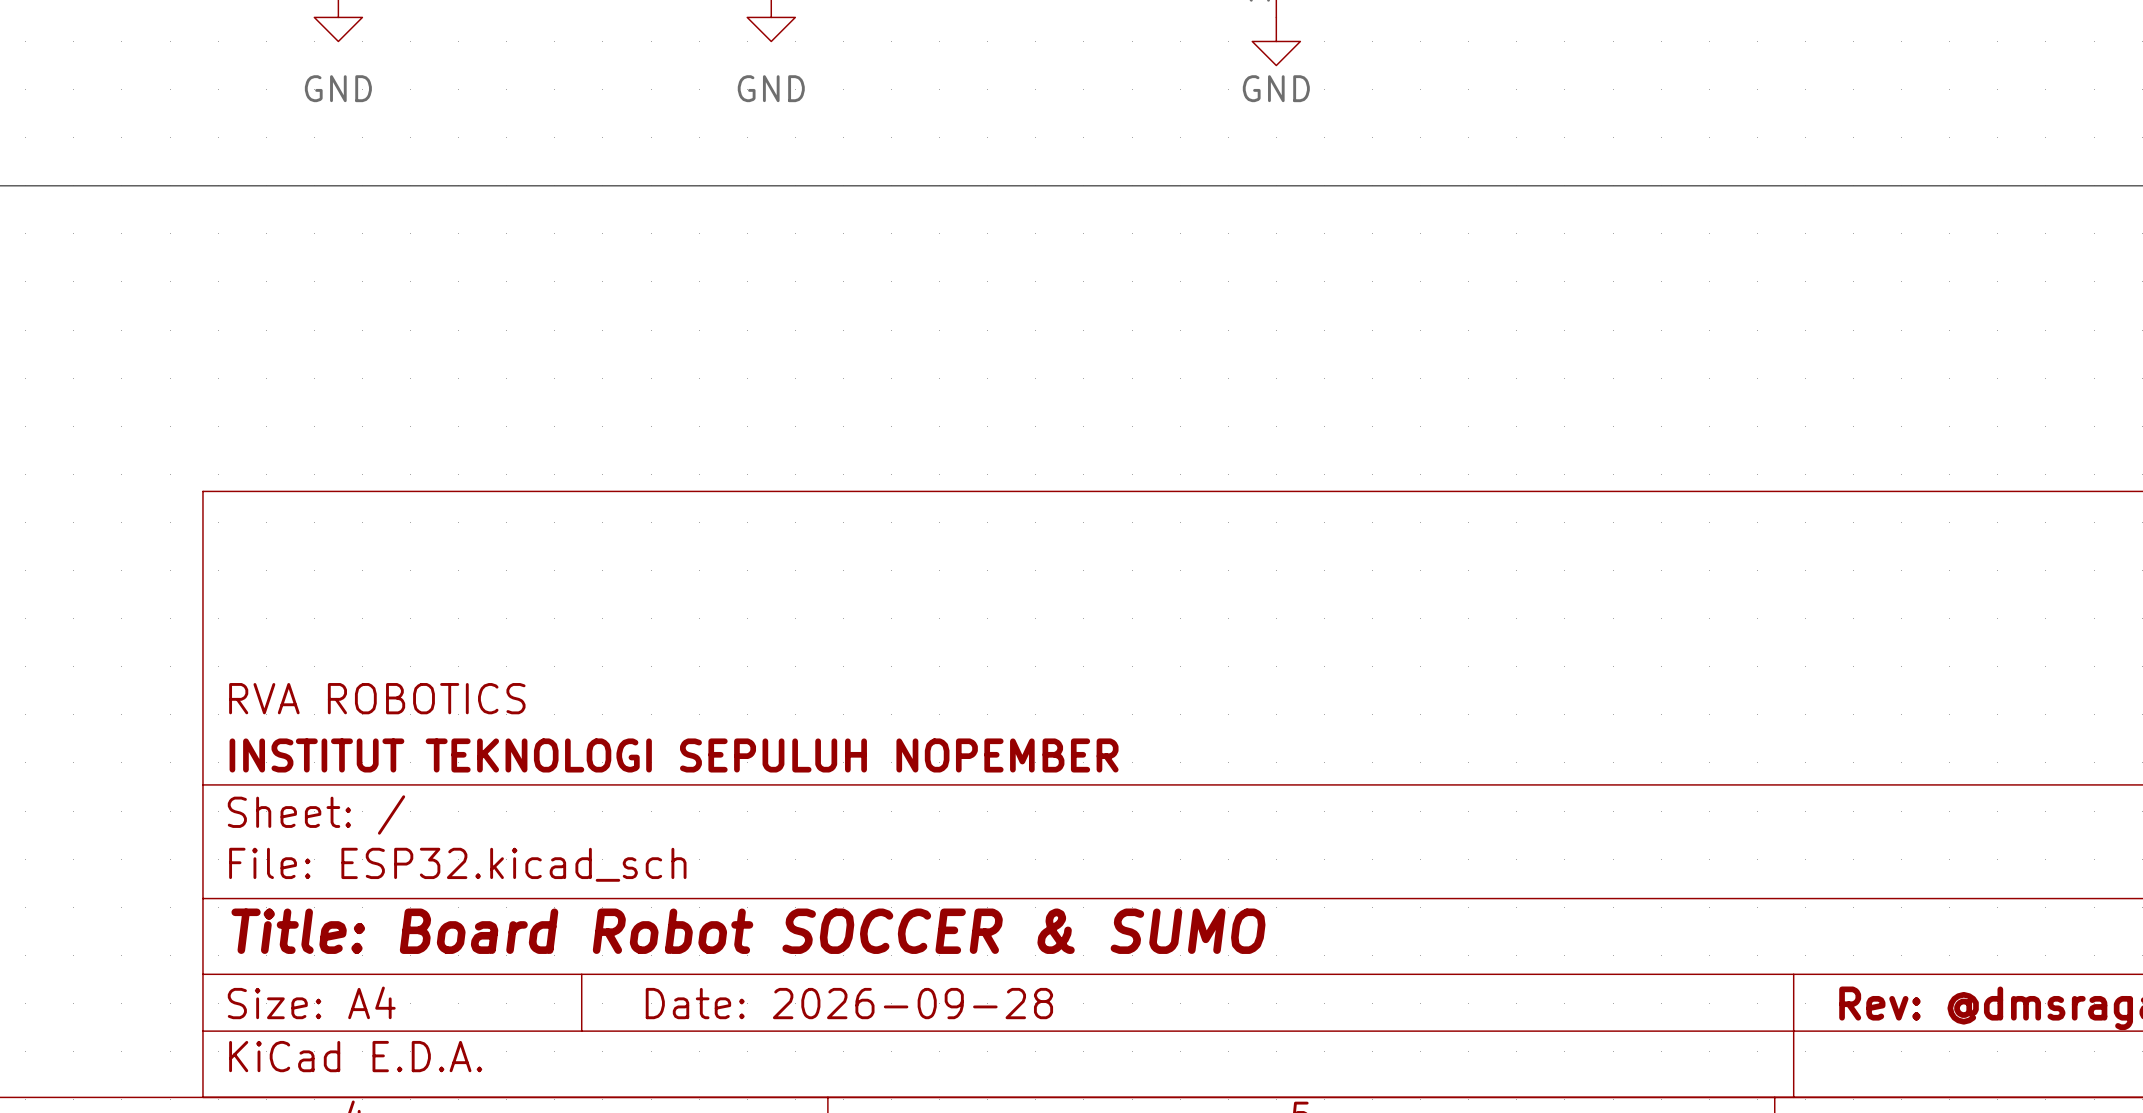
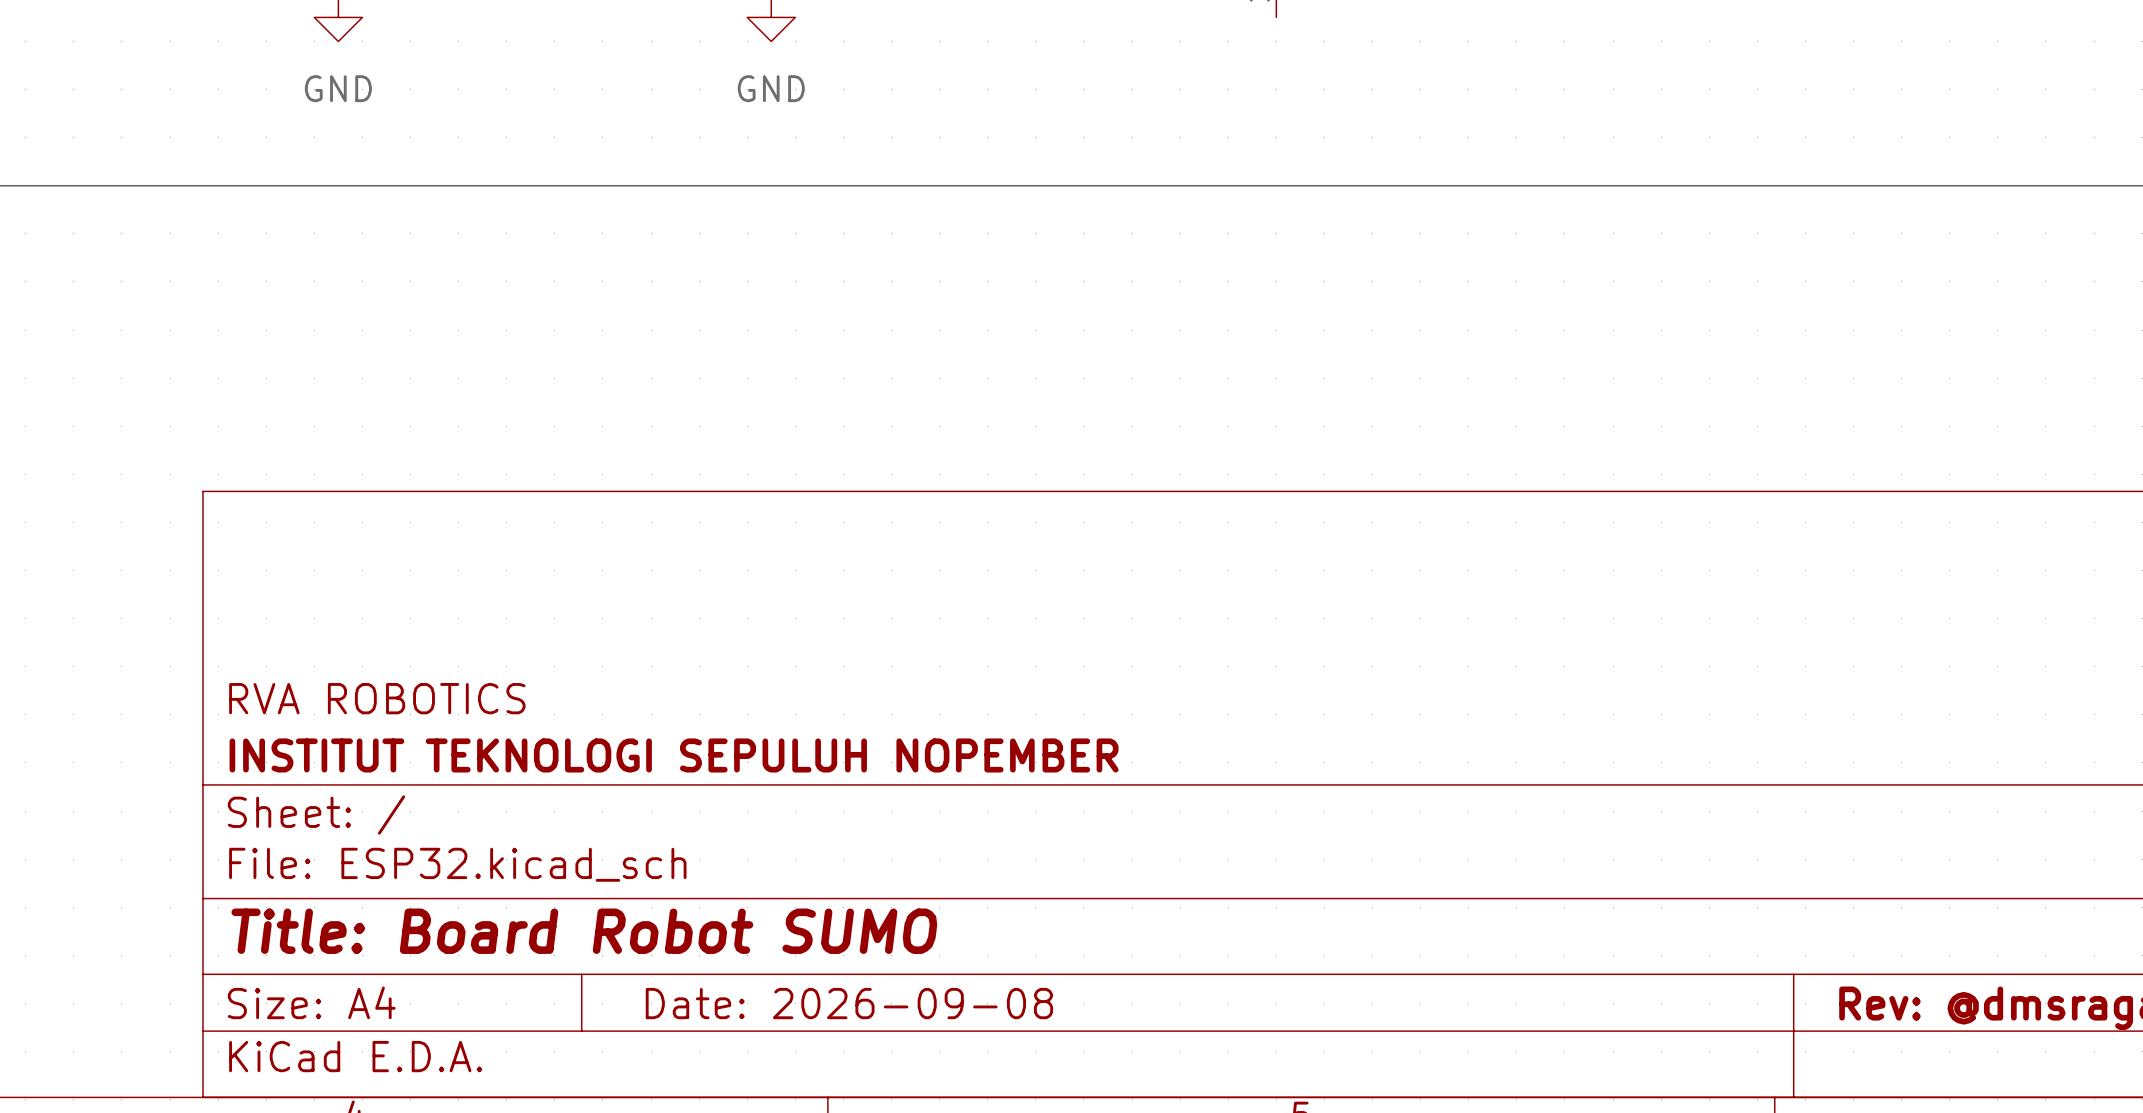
power symbol: GND (1276, 41) -> none
title block: Title: Board Robot SOCCER & SUMO (748, 931) -> Title: Board Robot SUMO (584, 931)
title block: Date: 2026-09-28 (849, 1003) -> Date: 2026-09-08 (849, 1003)

